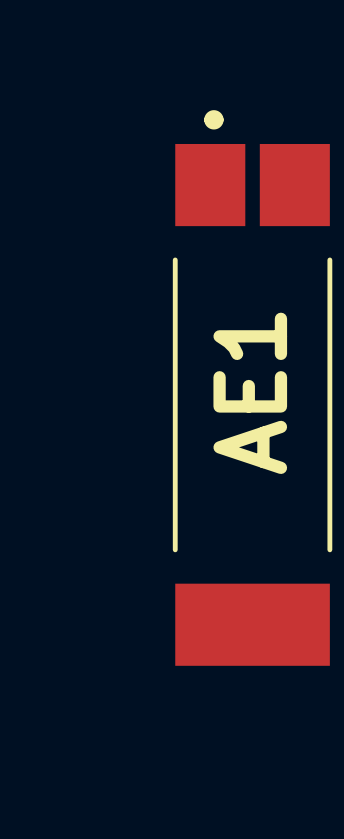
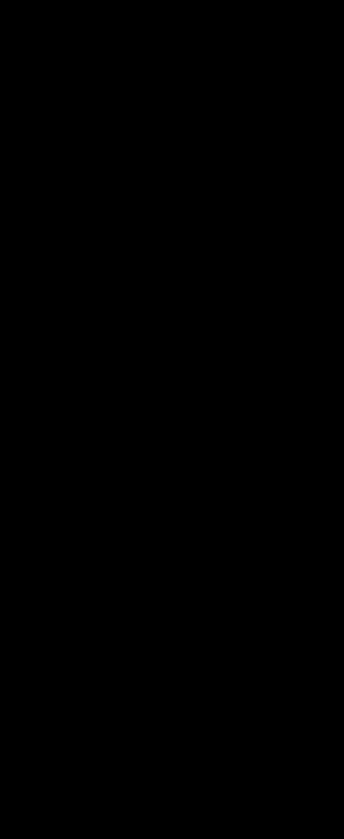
AE1: (252, 387) -> none

